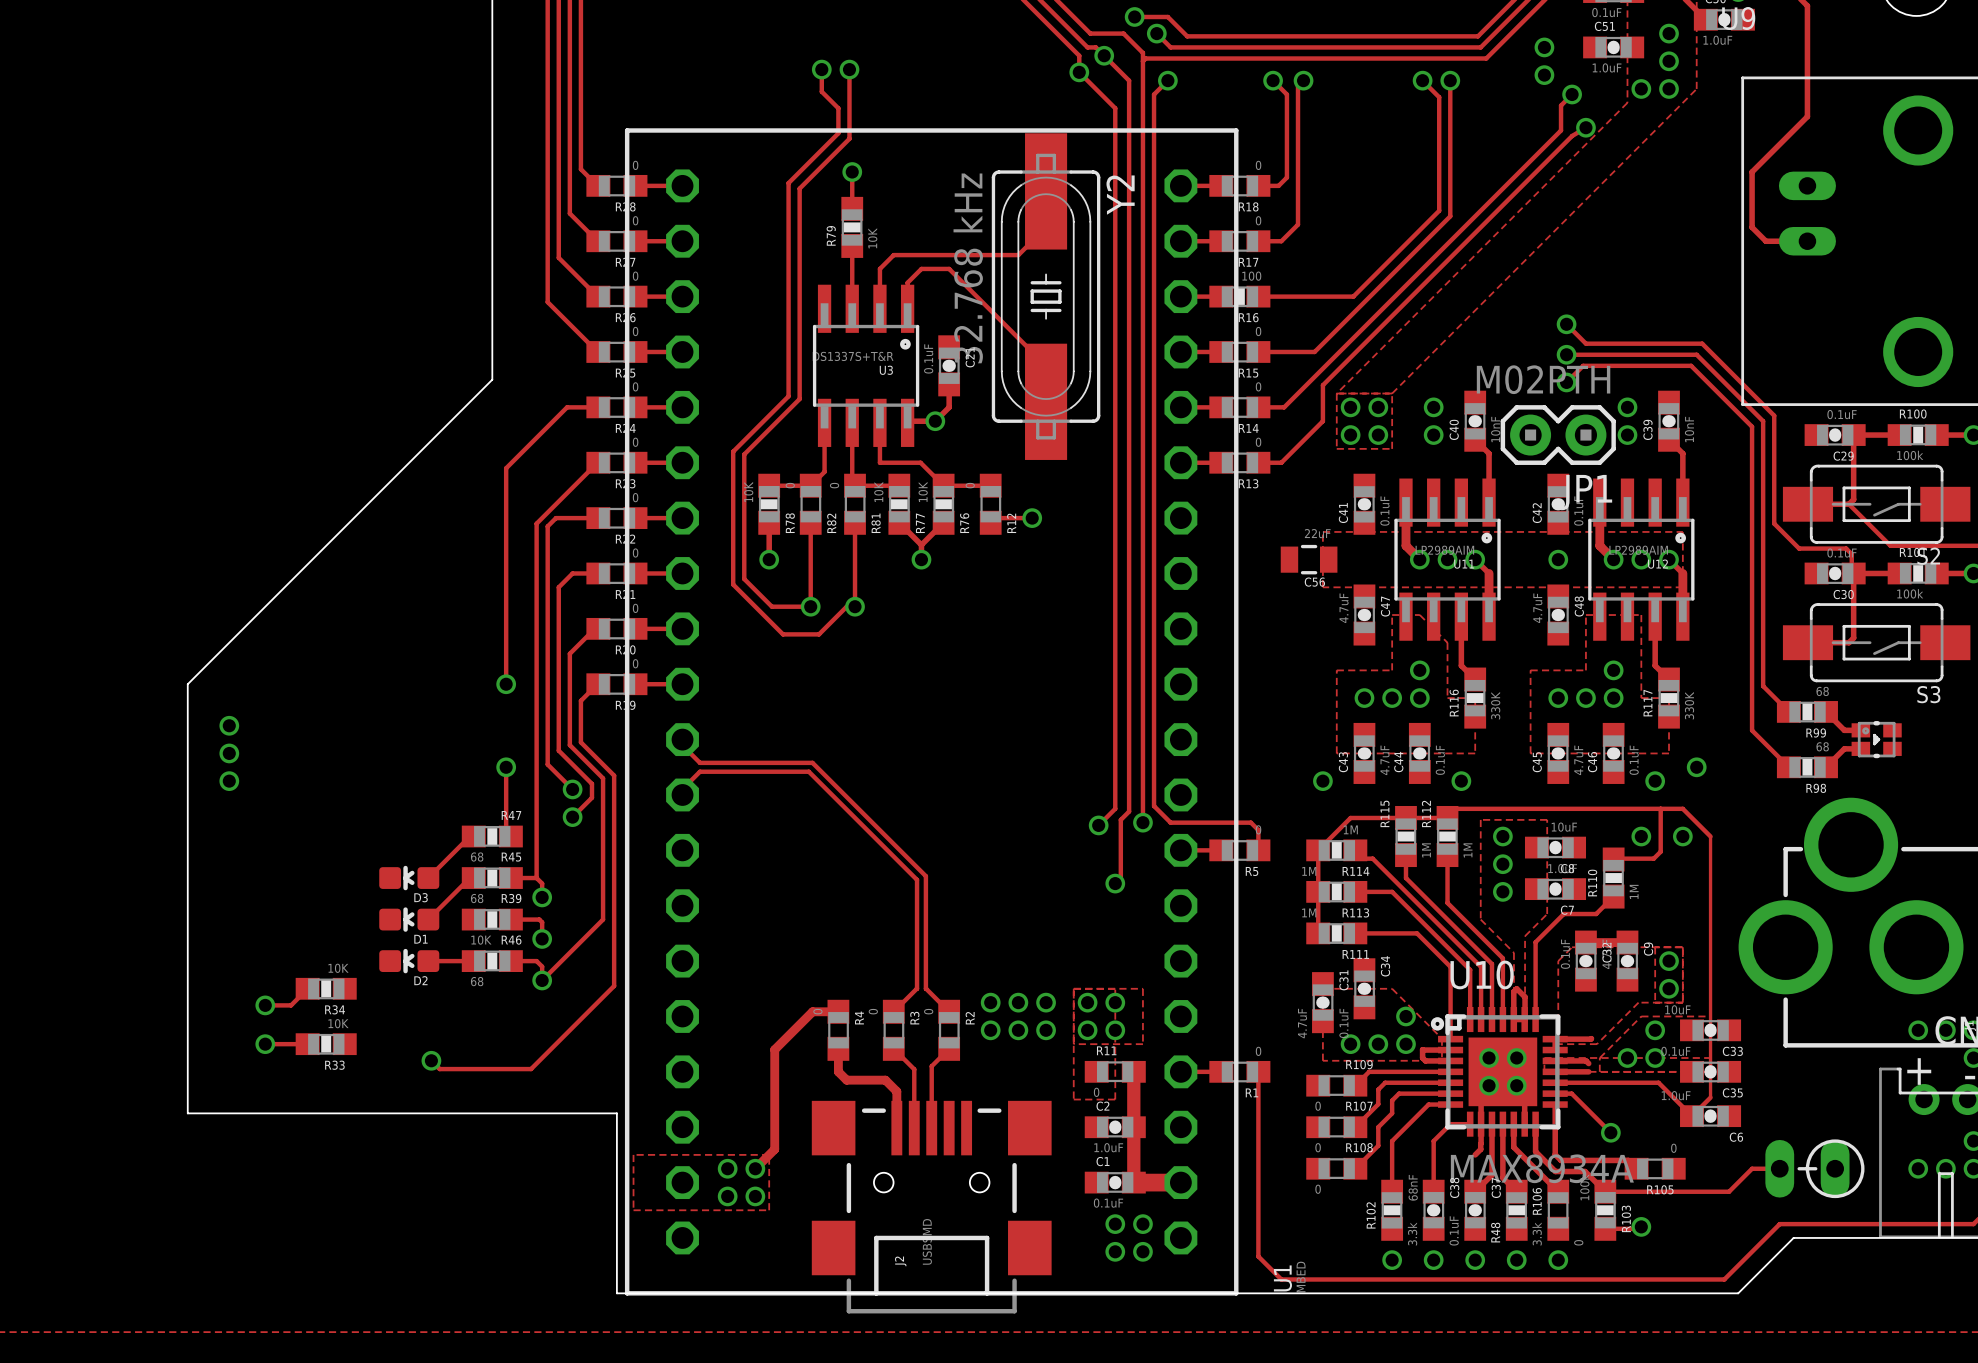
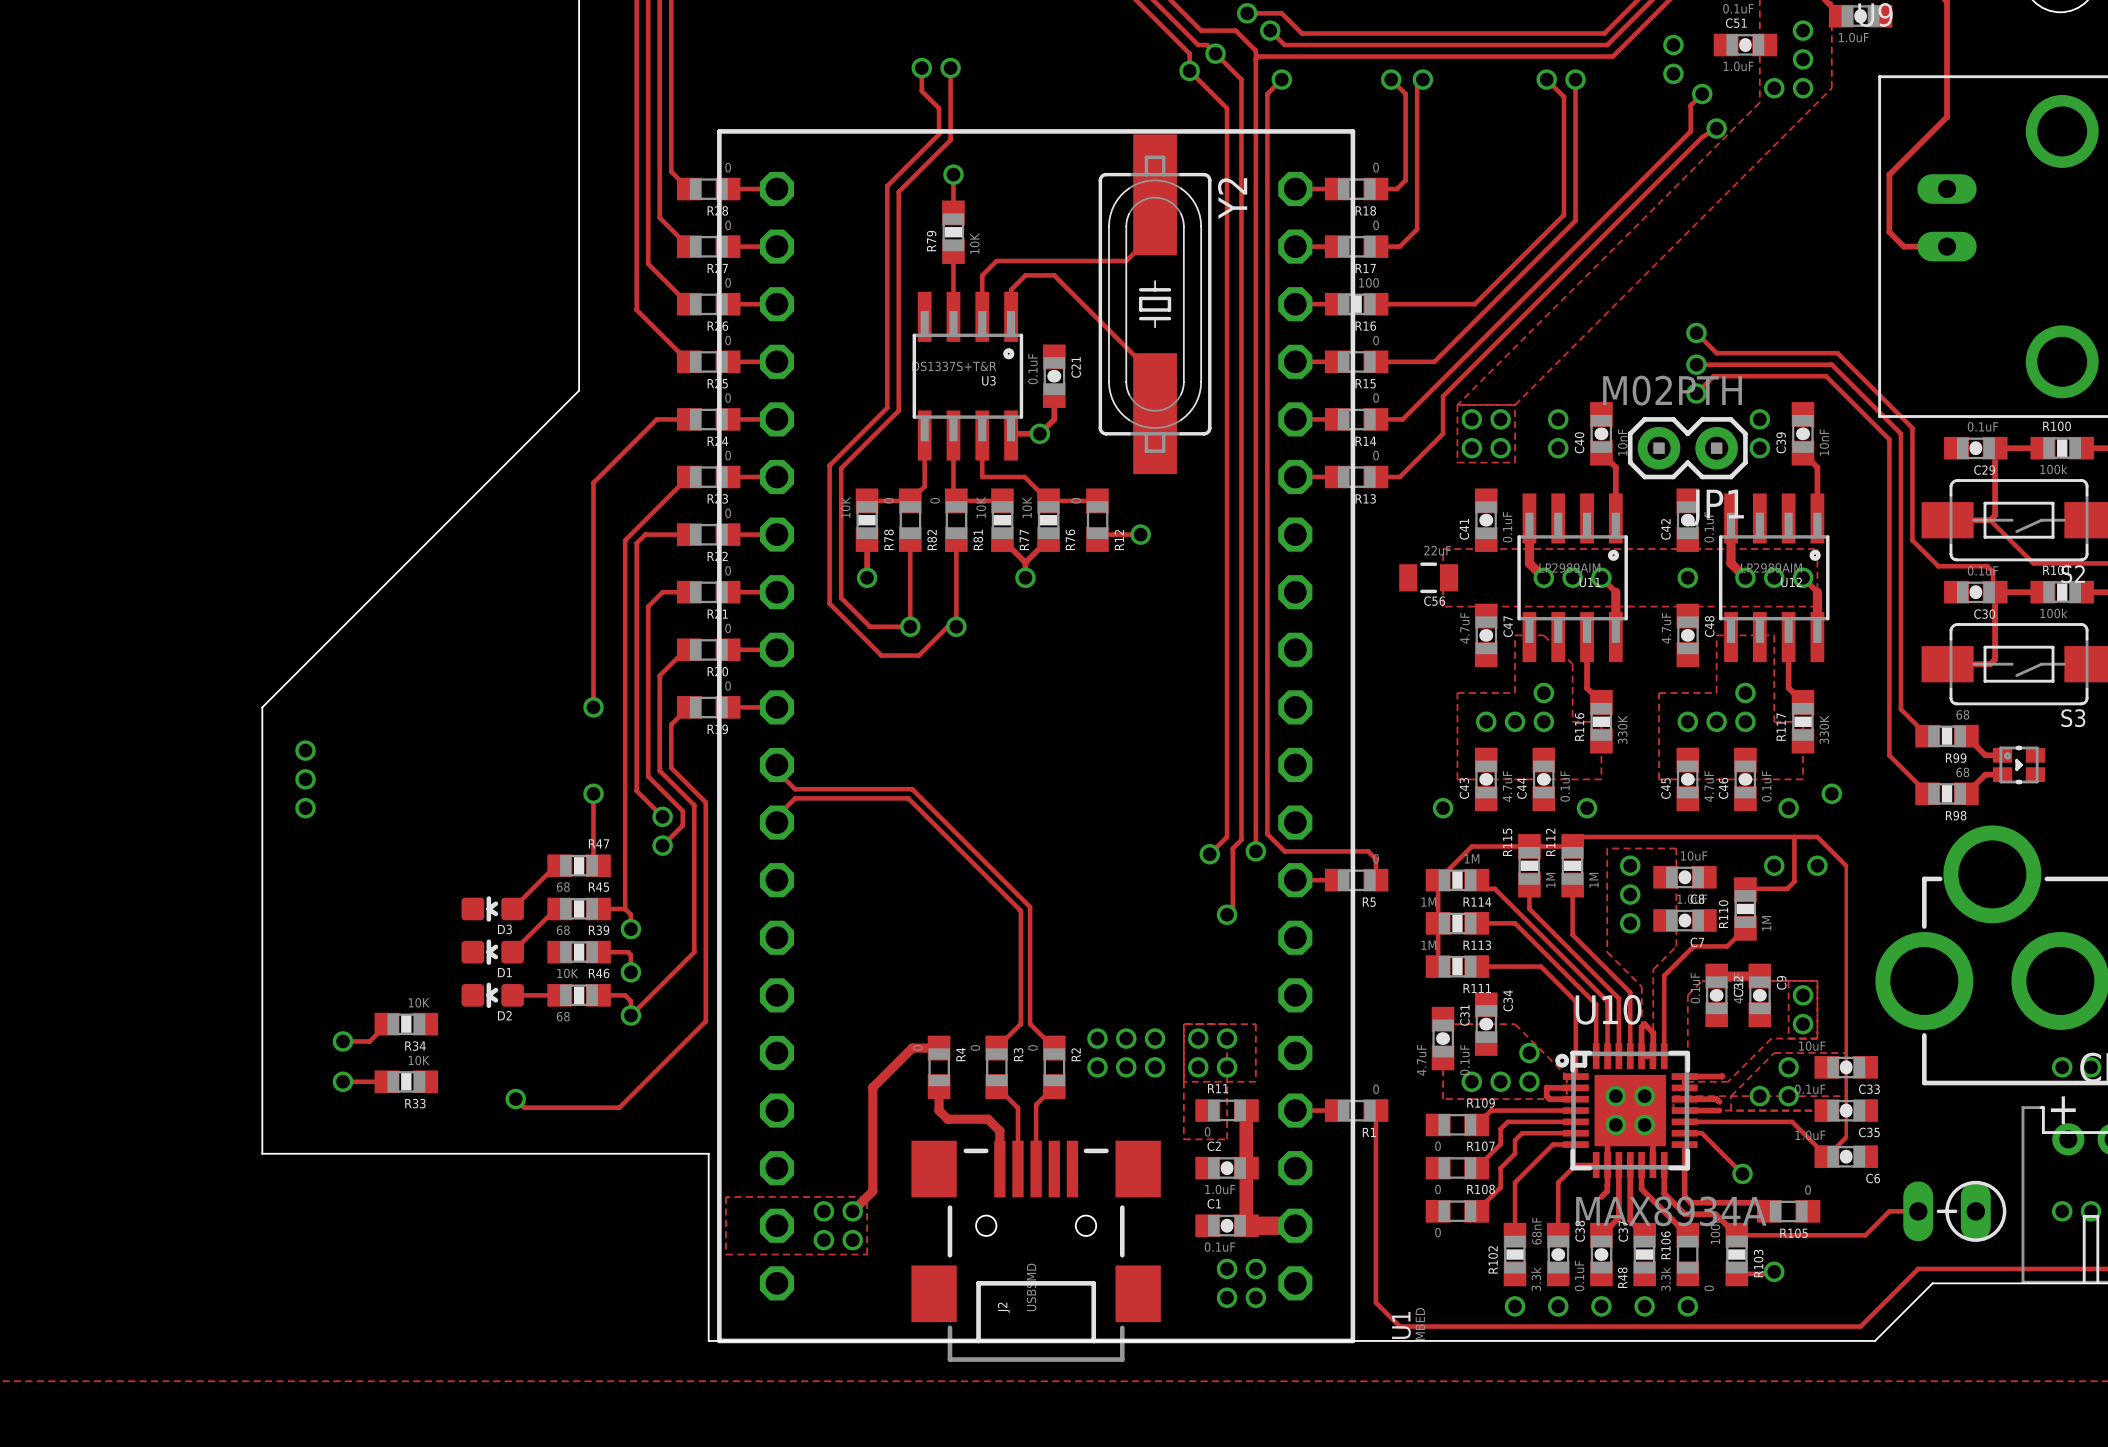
Y2 value: 32.768 kHz (968, 268) -> none

